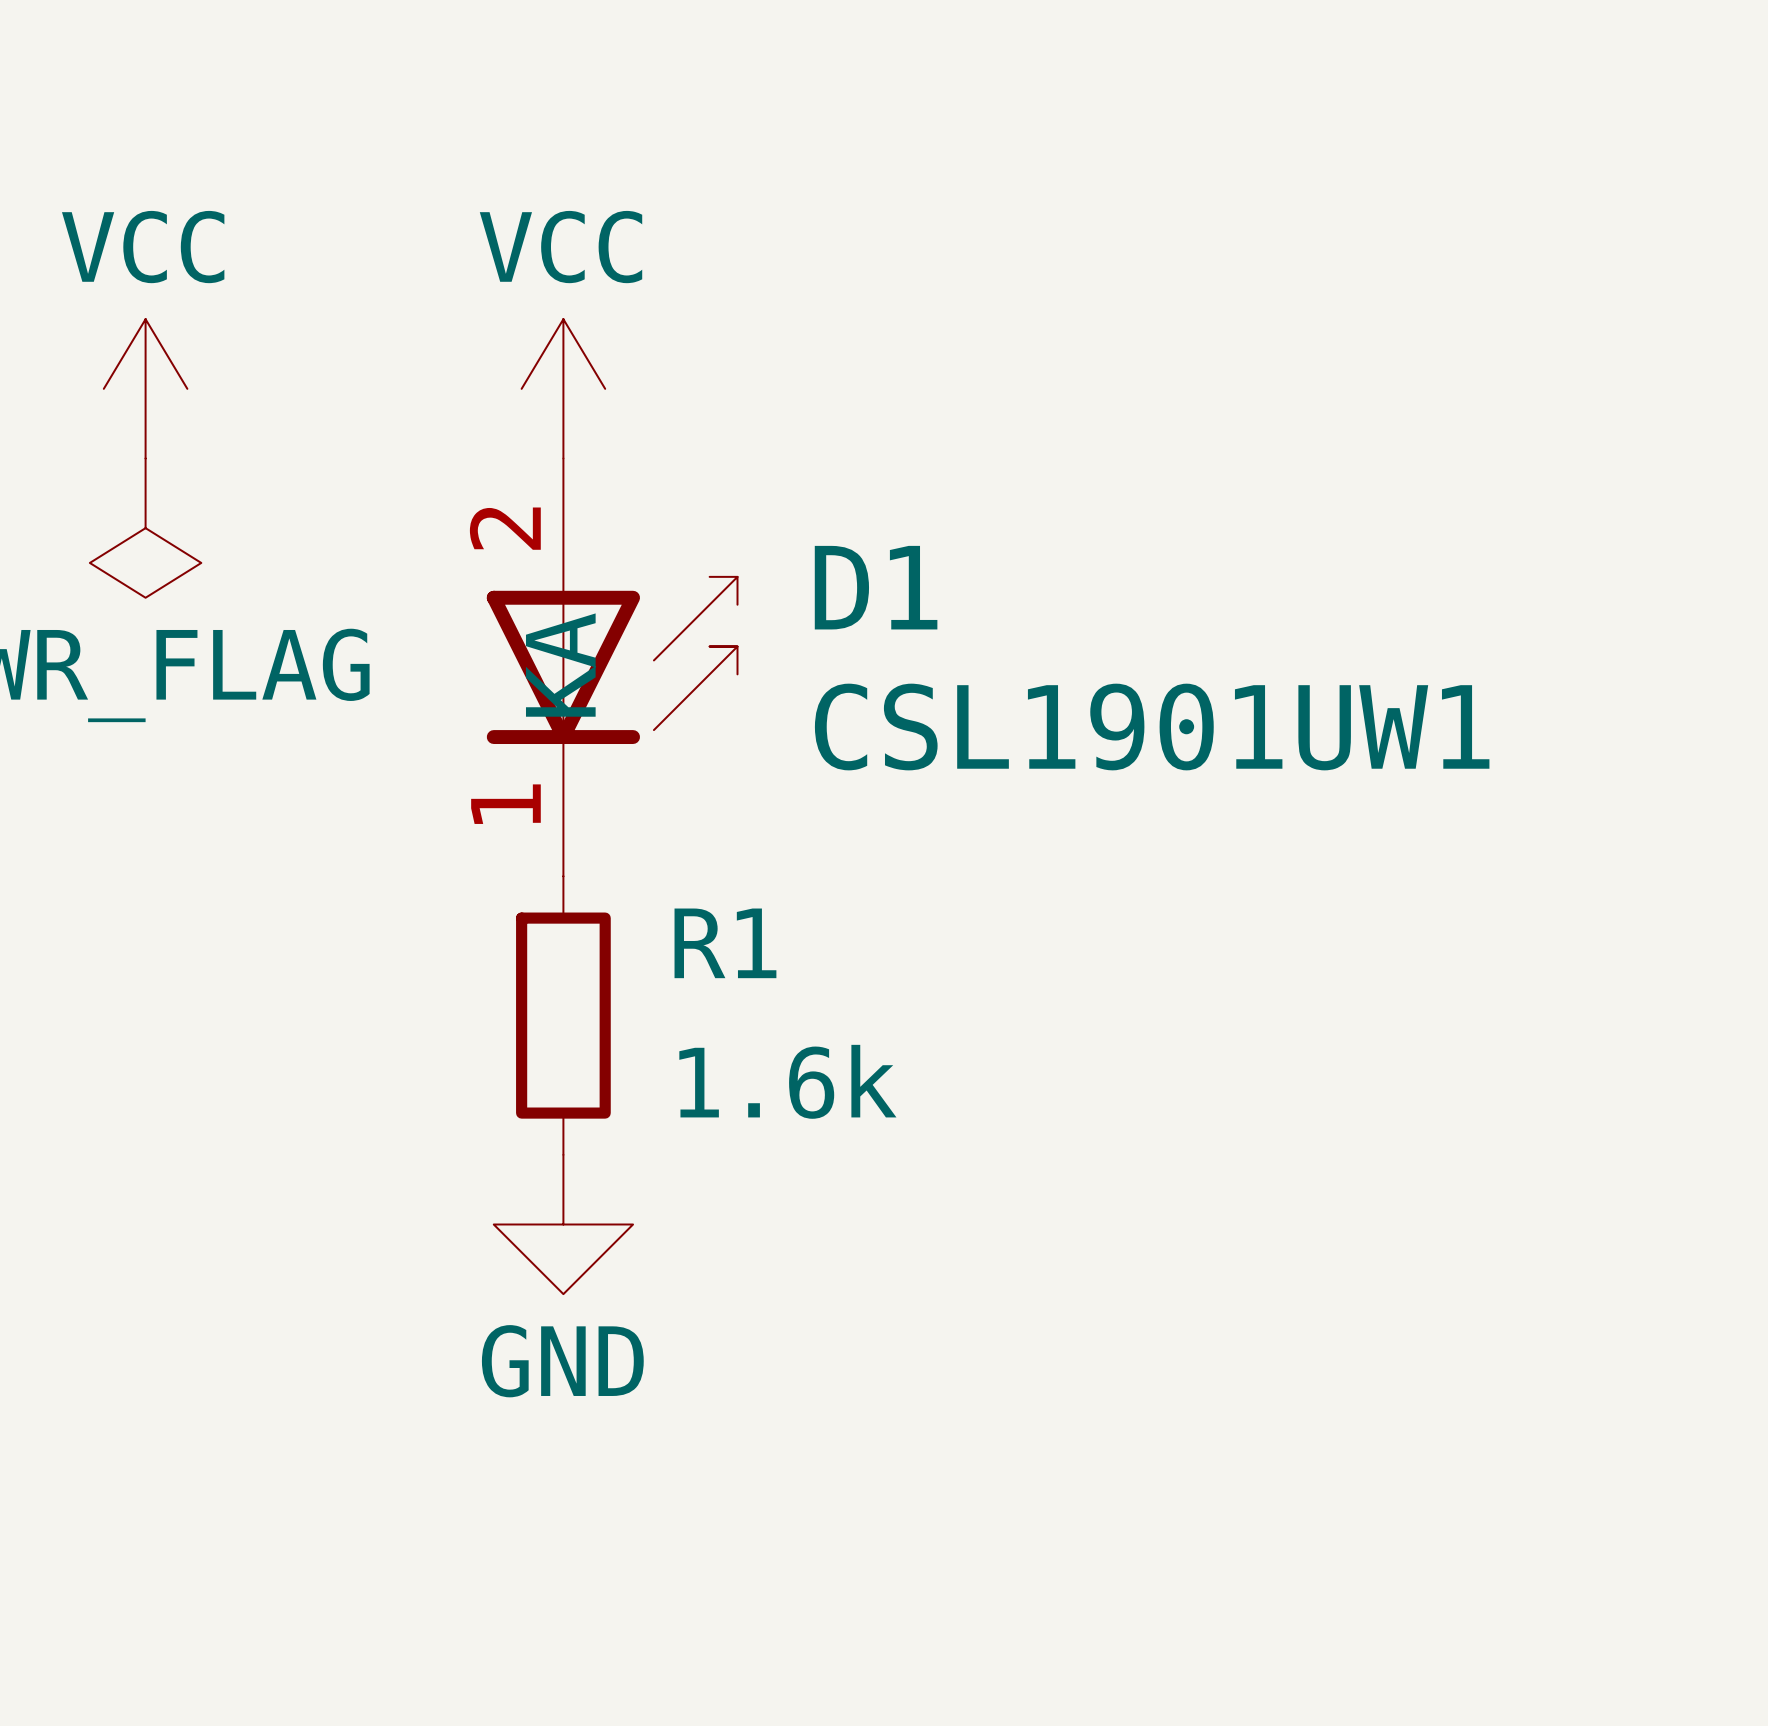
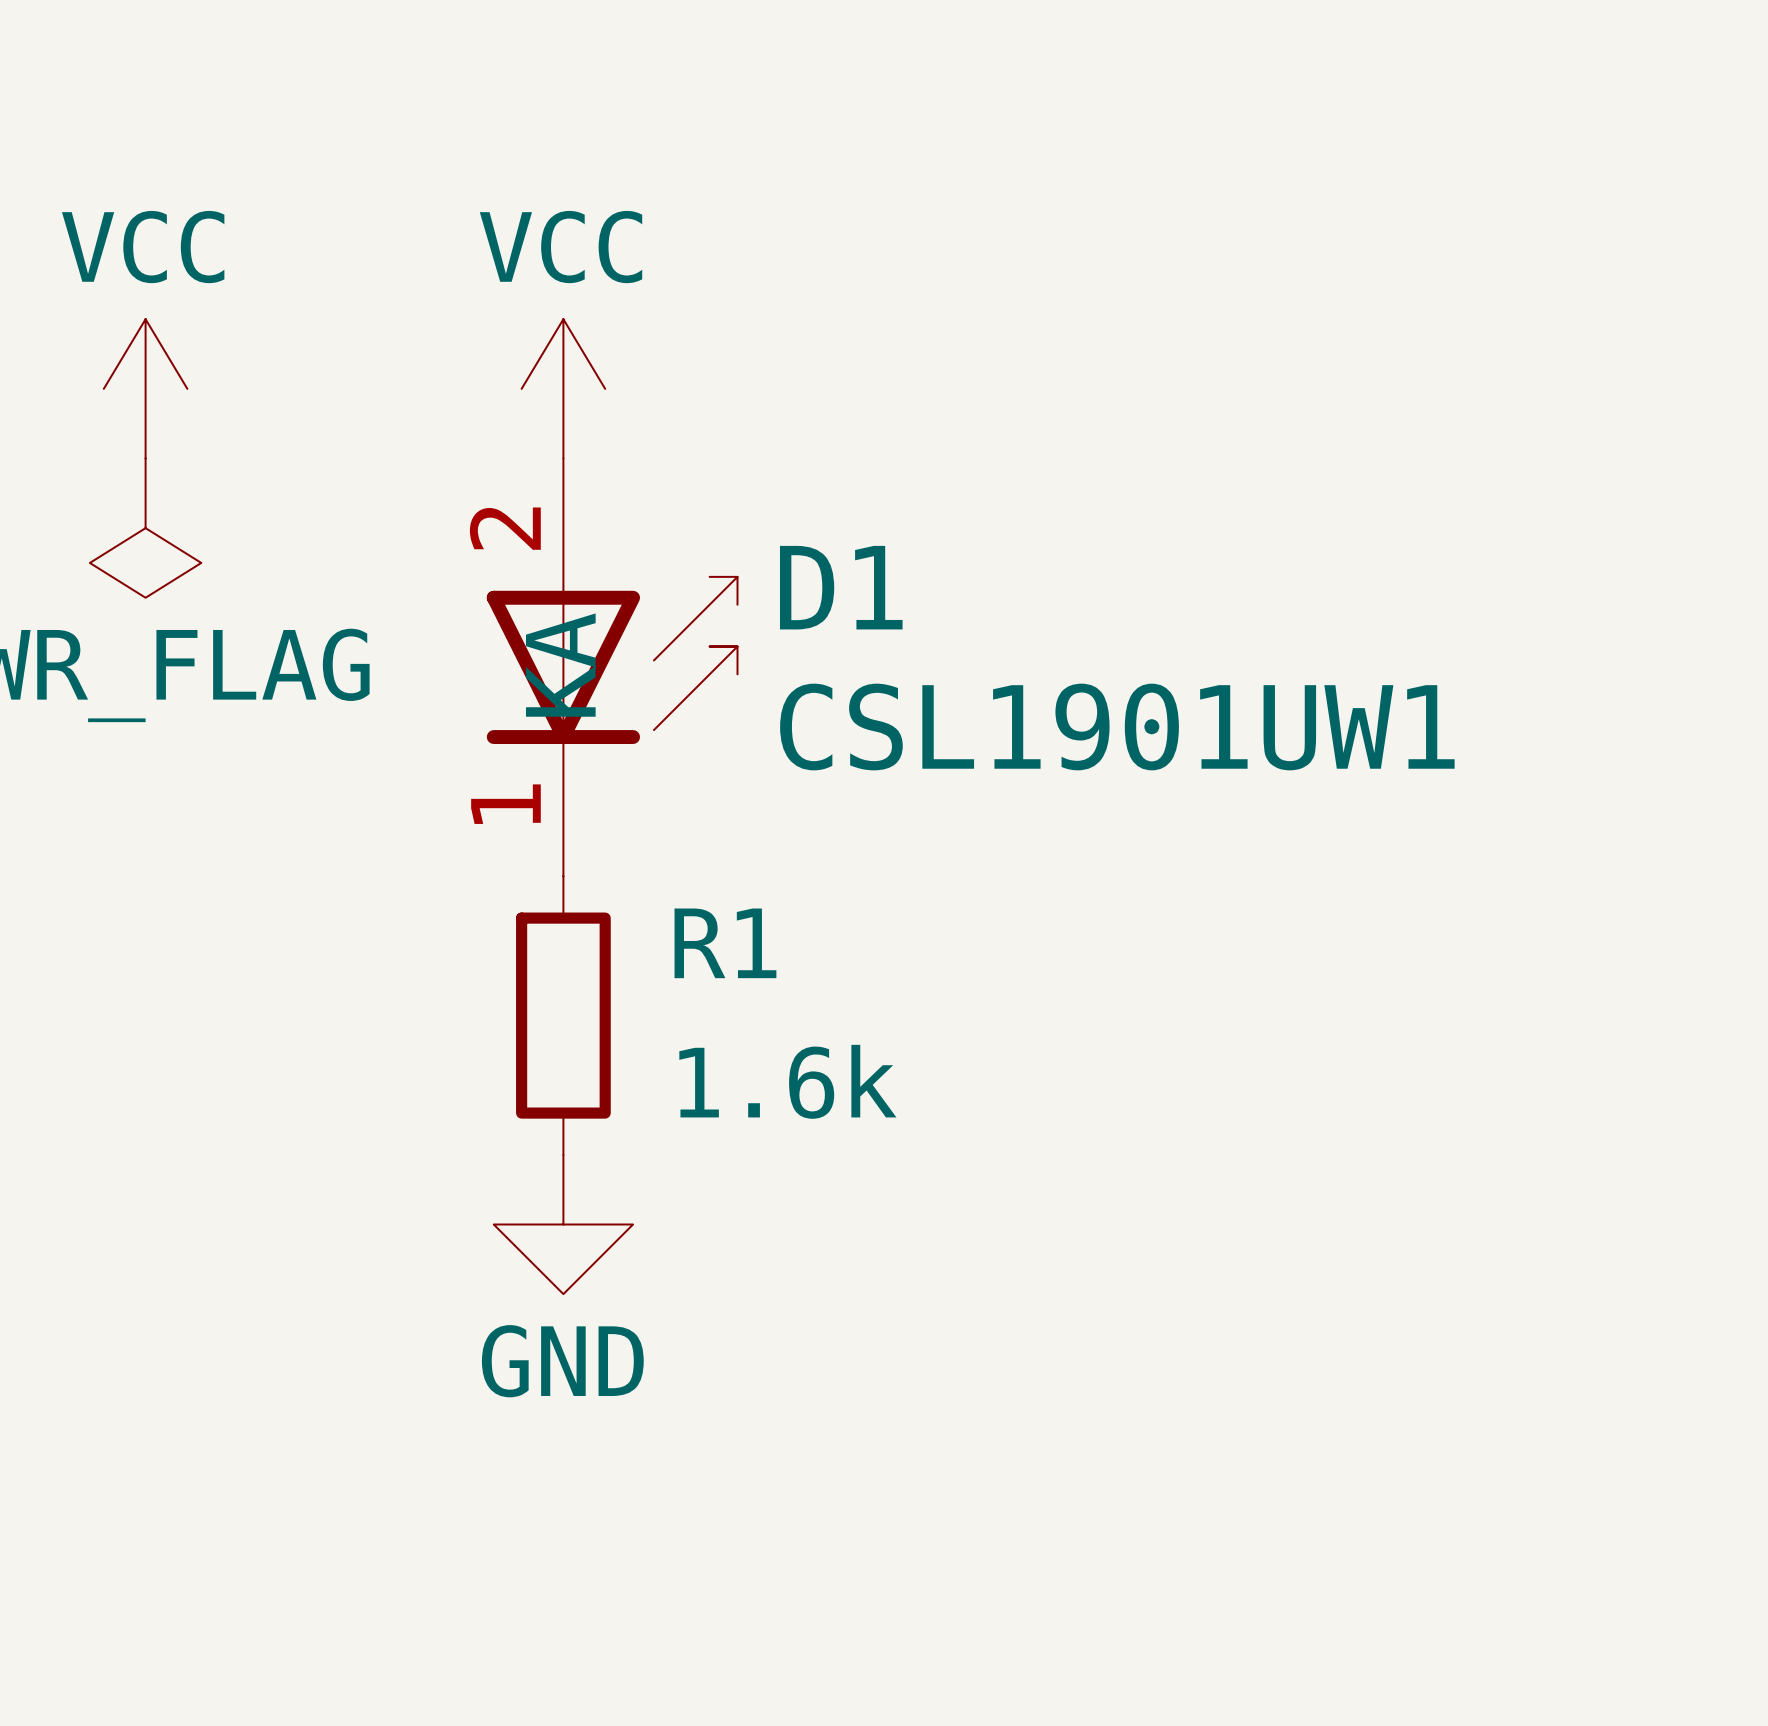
D1 name position: D1 (876, 587) -> D1 (841, 587)
D1 value position: CSL1901UW1 (1152, 727) -> CSL1901UW1 (1117, 727)

